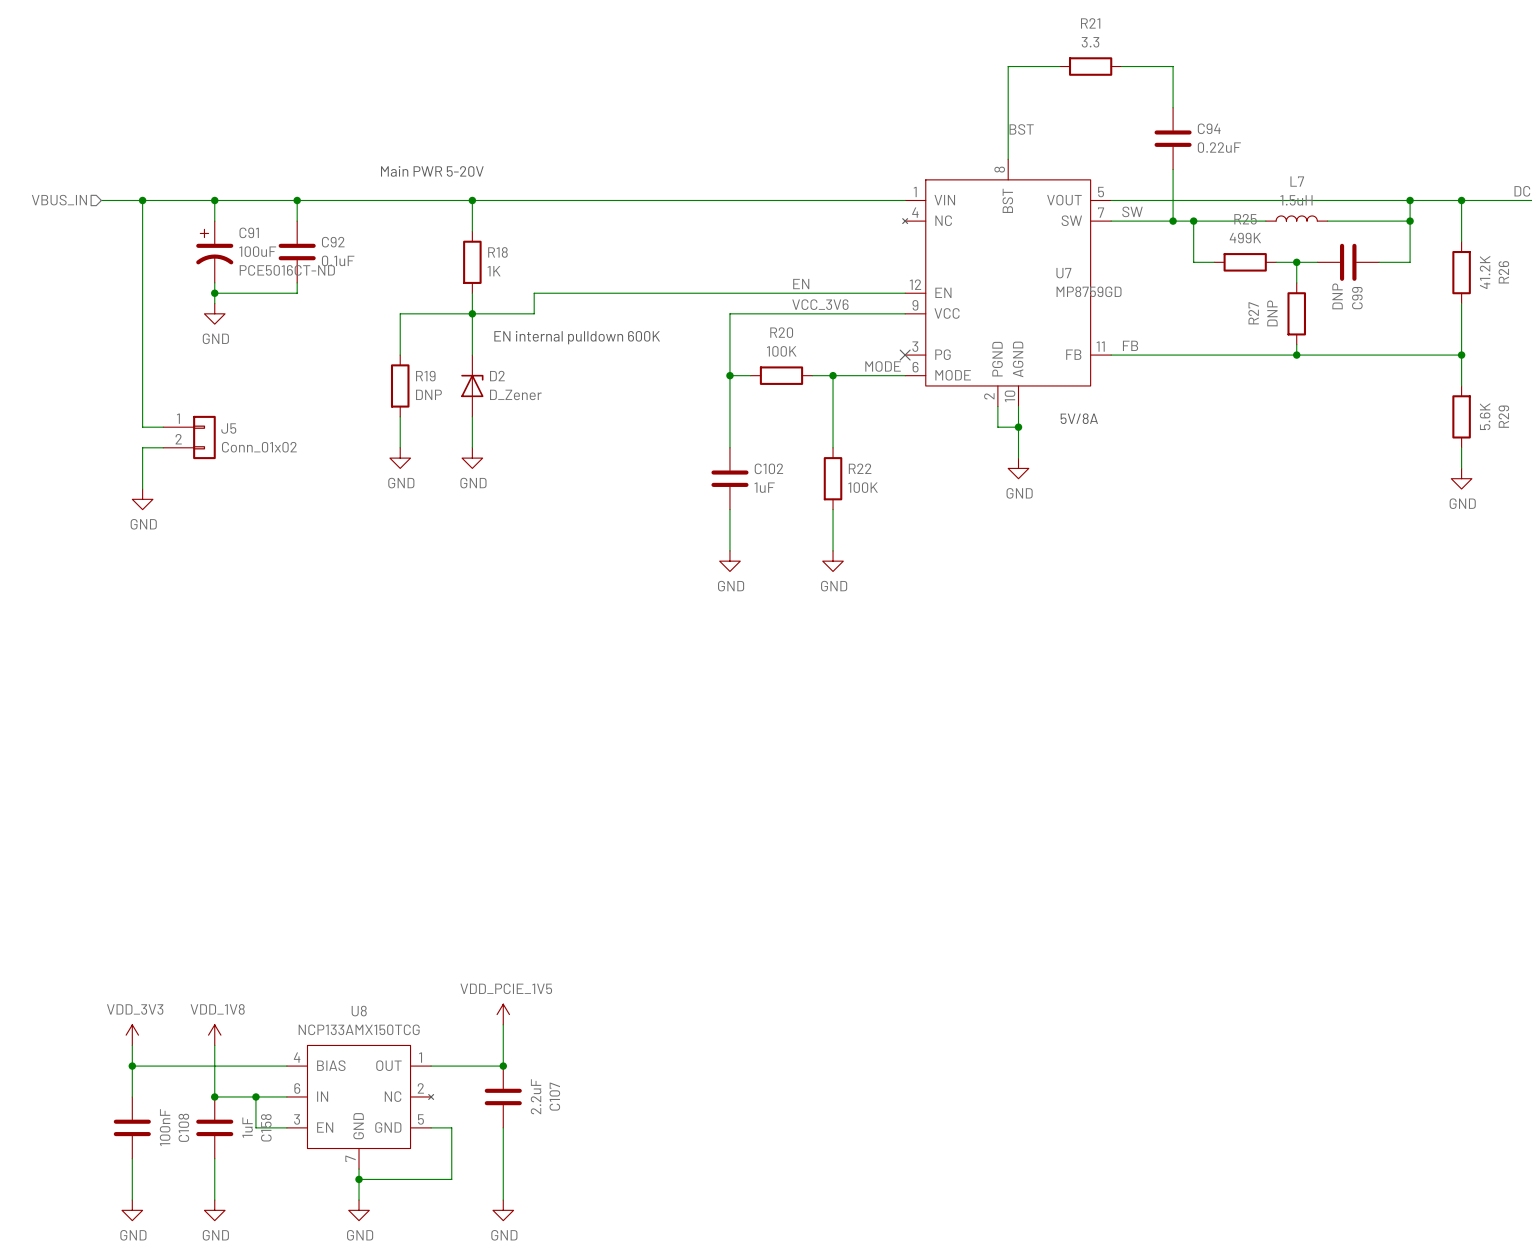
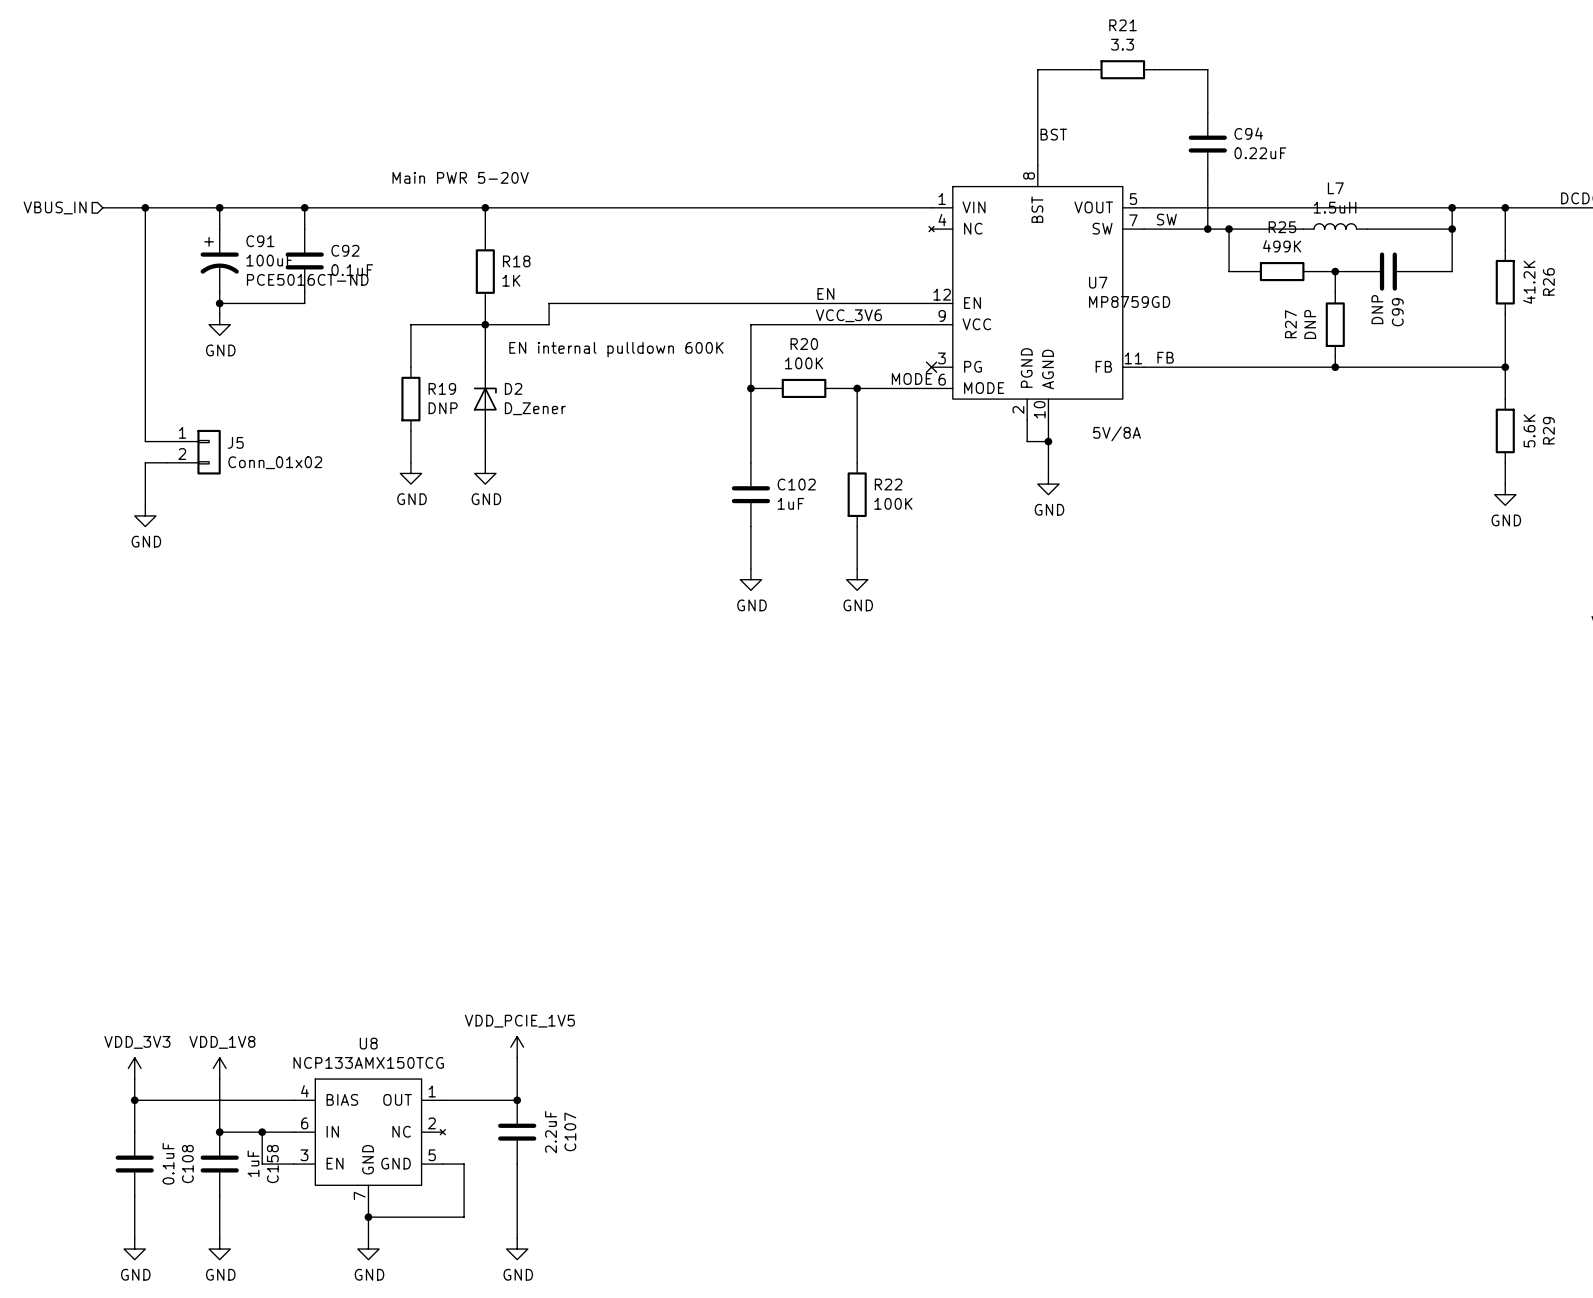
C108 value: 100nF (165, 1127) -> 0.1uF (168, 1163)

